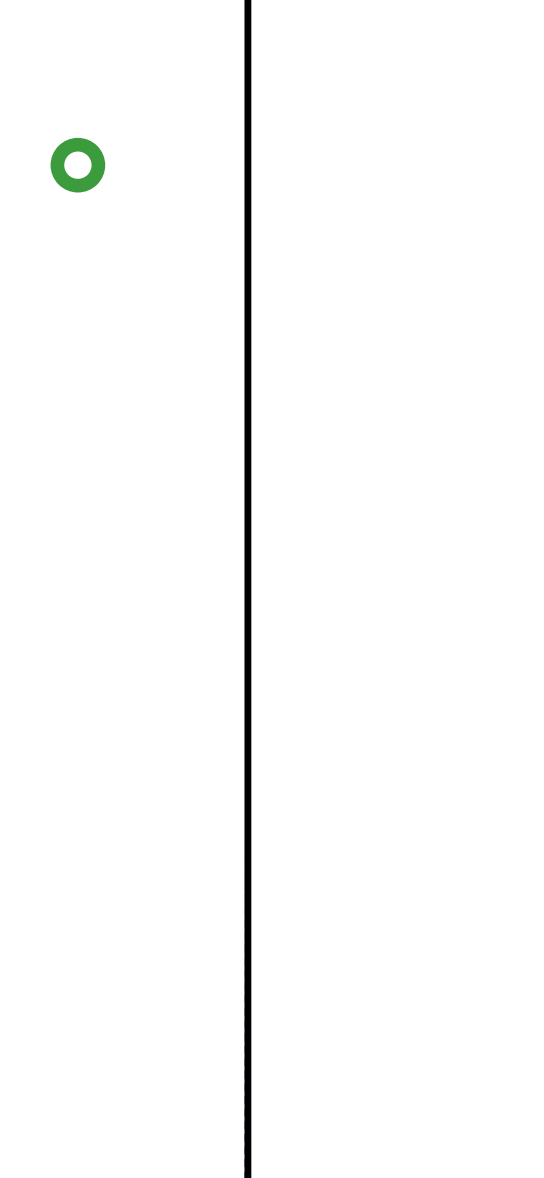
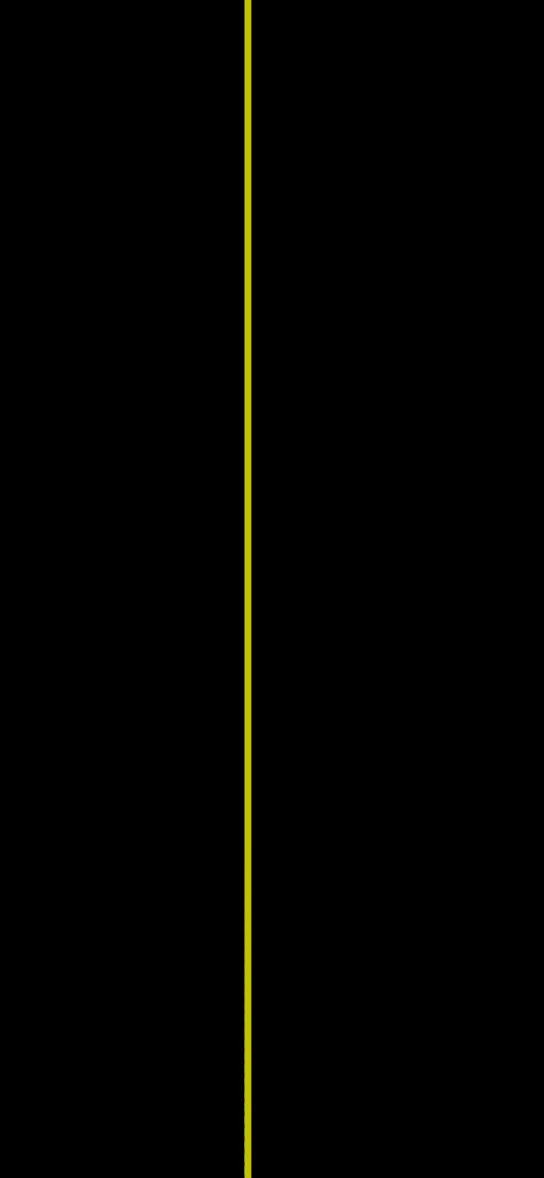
via: (77, 165) -> none

